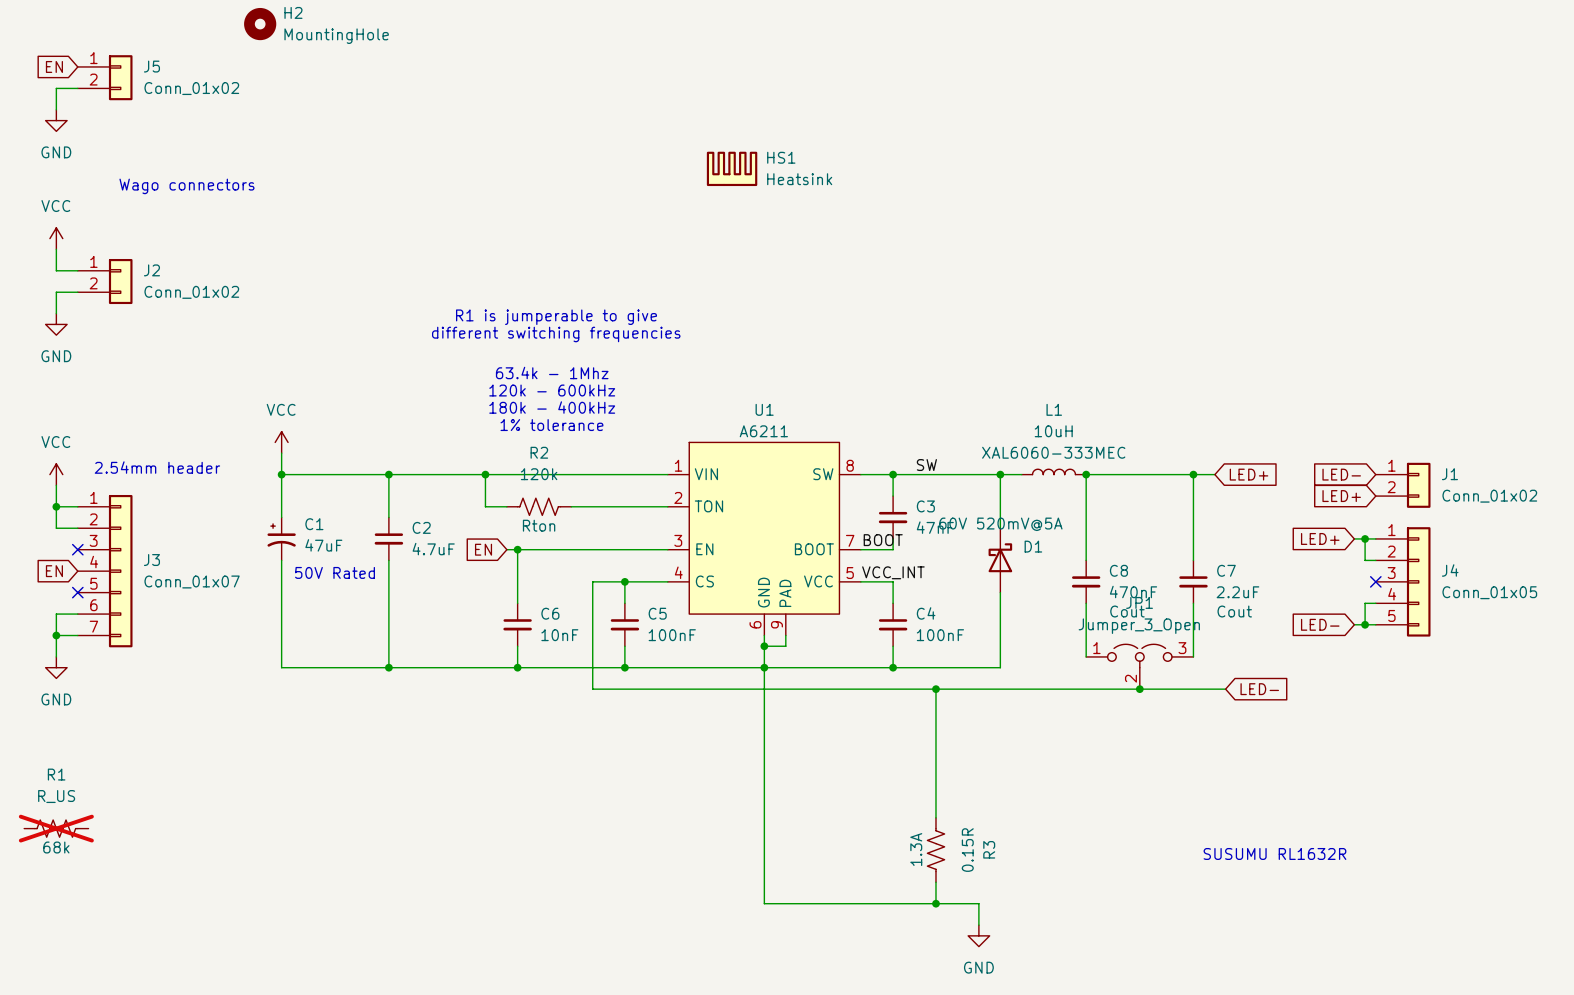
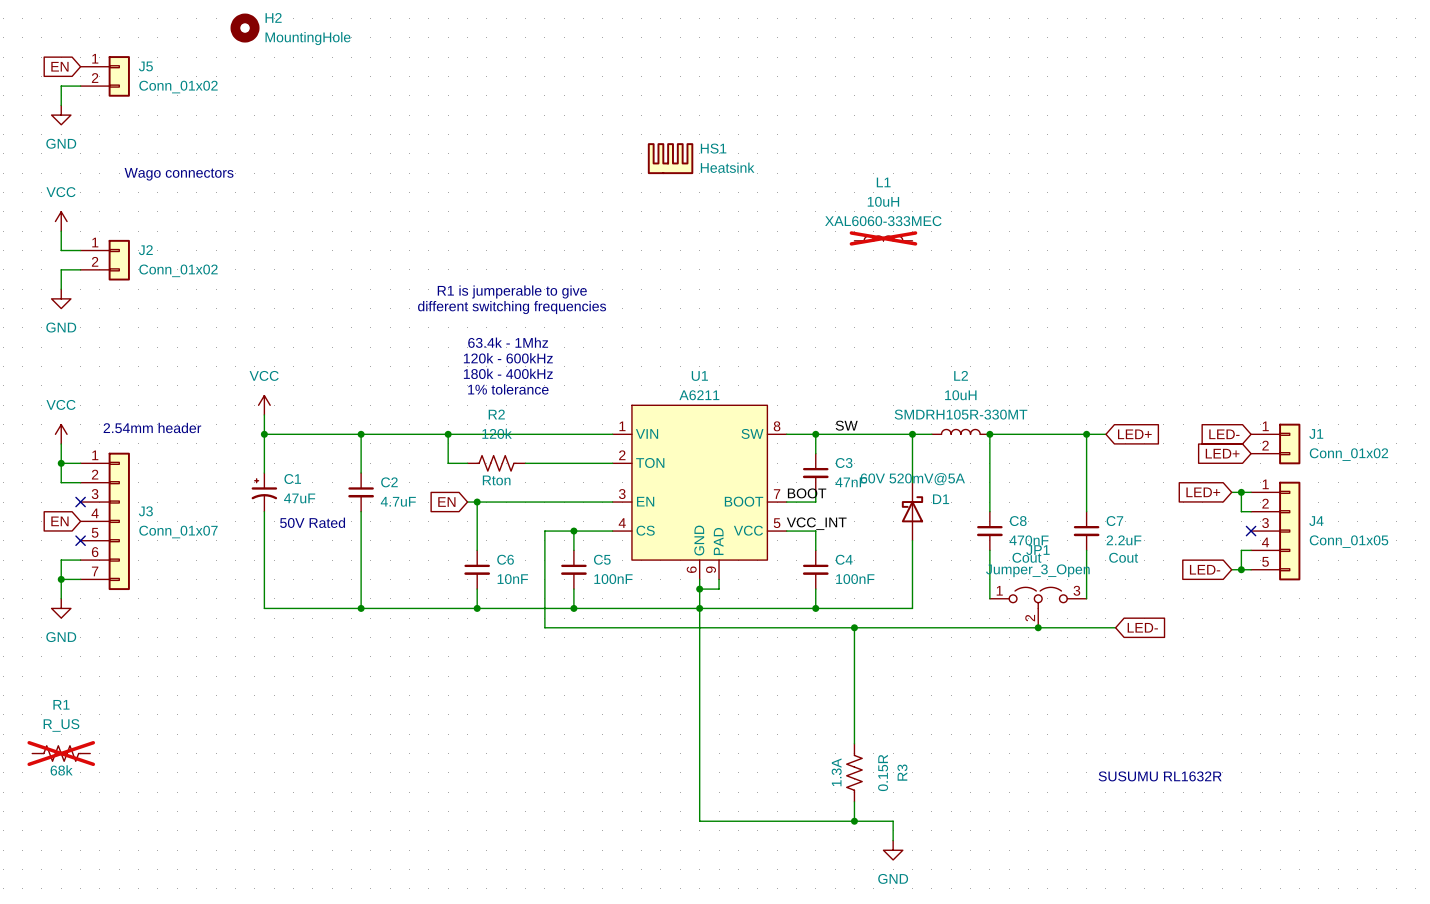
L1: none -> 10uH (883, 238)
L1 name: L1 (1054, 409) -> L2 (961, 375)
L1 text: XAL6060-333MEC (1053, 452) -> SMDRH105R-330MT (961, 414)

